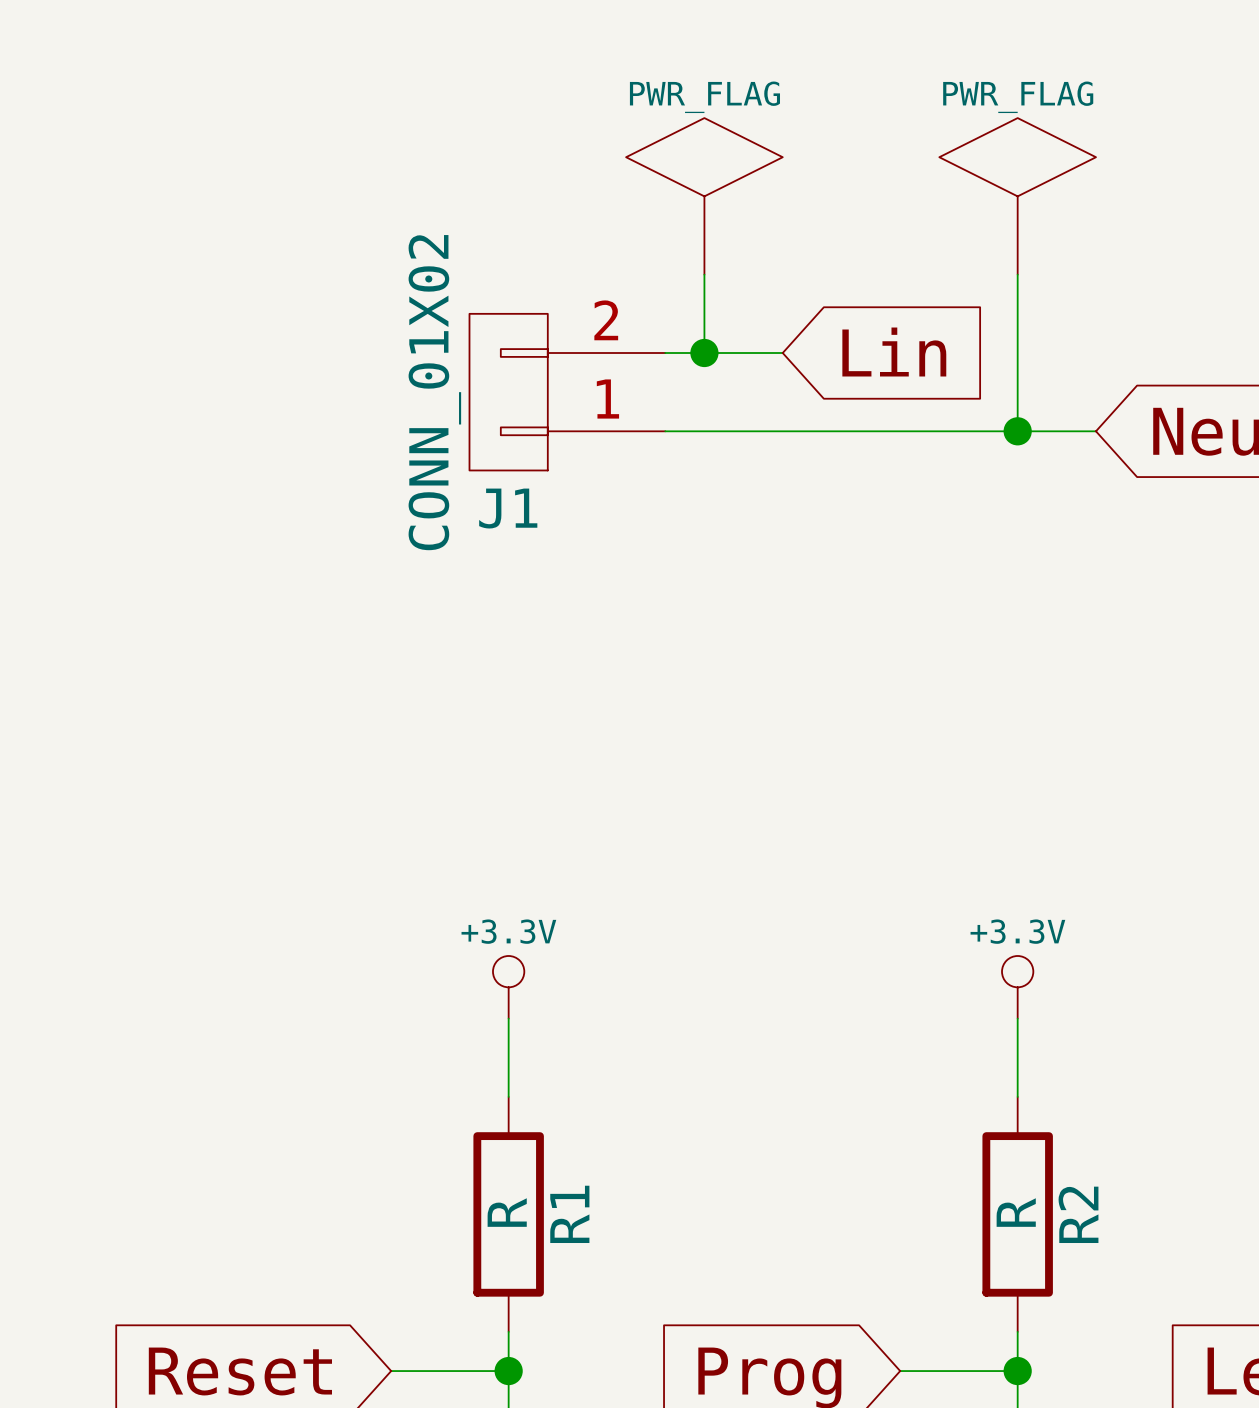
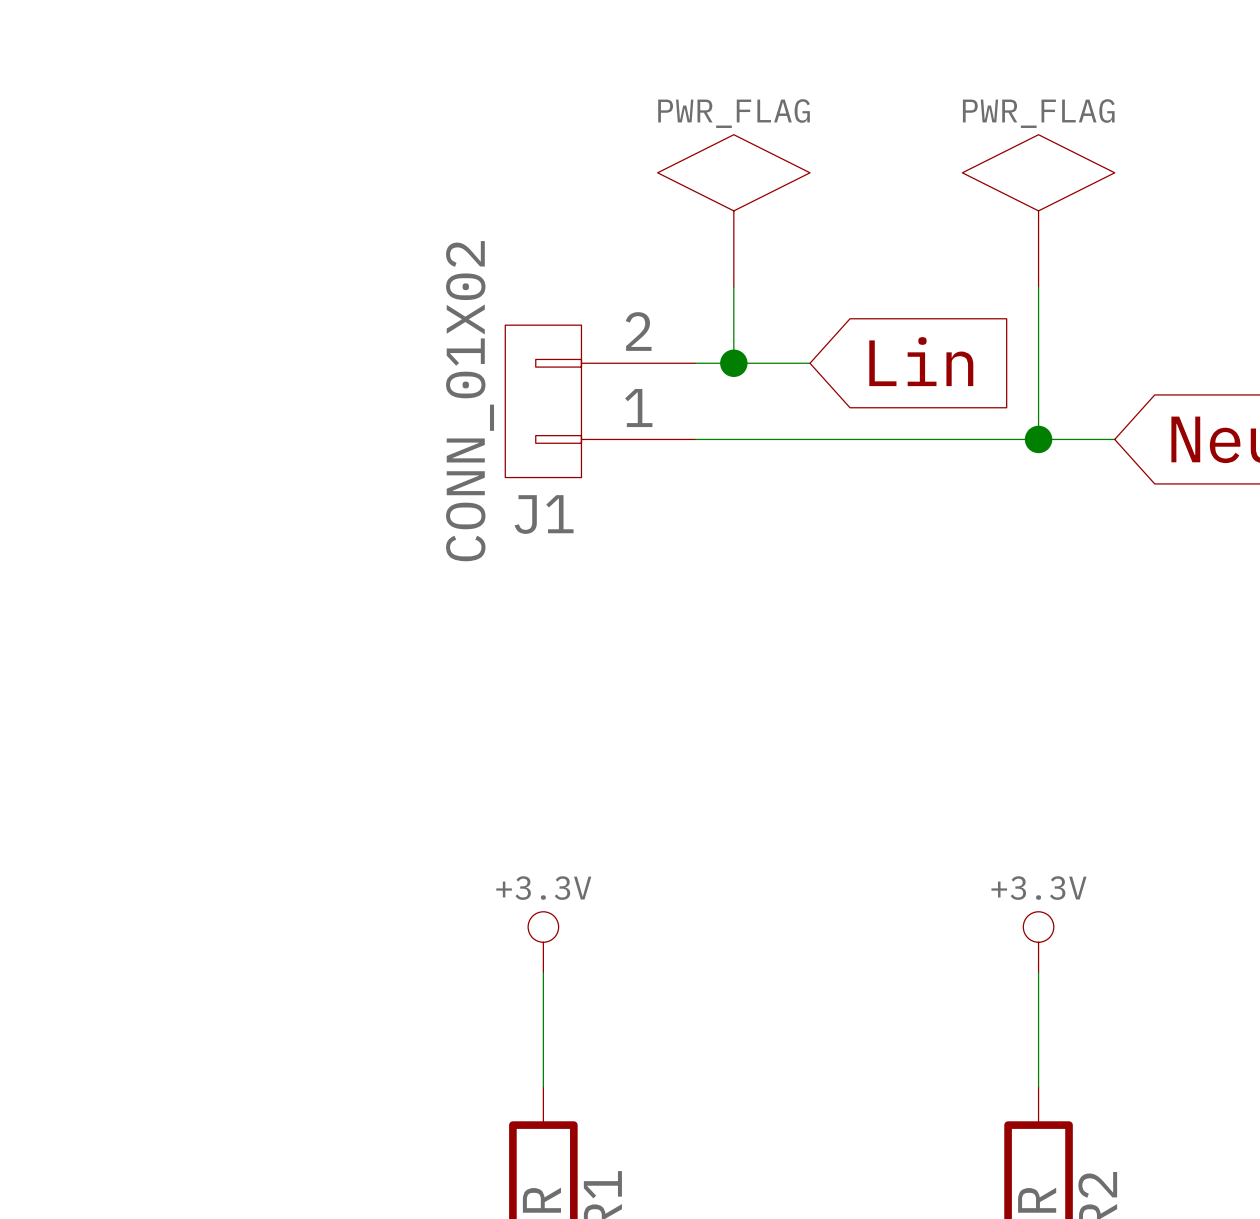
power symbol position: +3.3V (508, 987) -> +3.3V (543, 942)
power symbol position: +3.3V (1017, 987) -> +3.3V (1038, 942)

